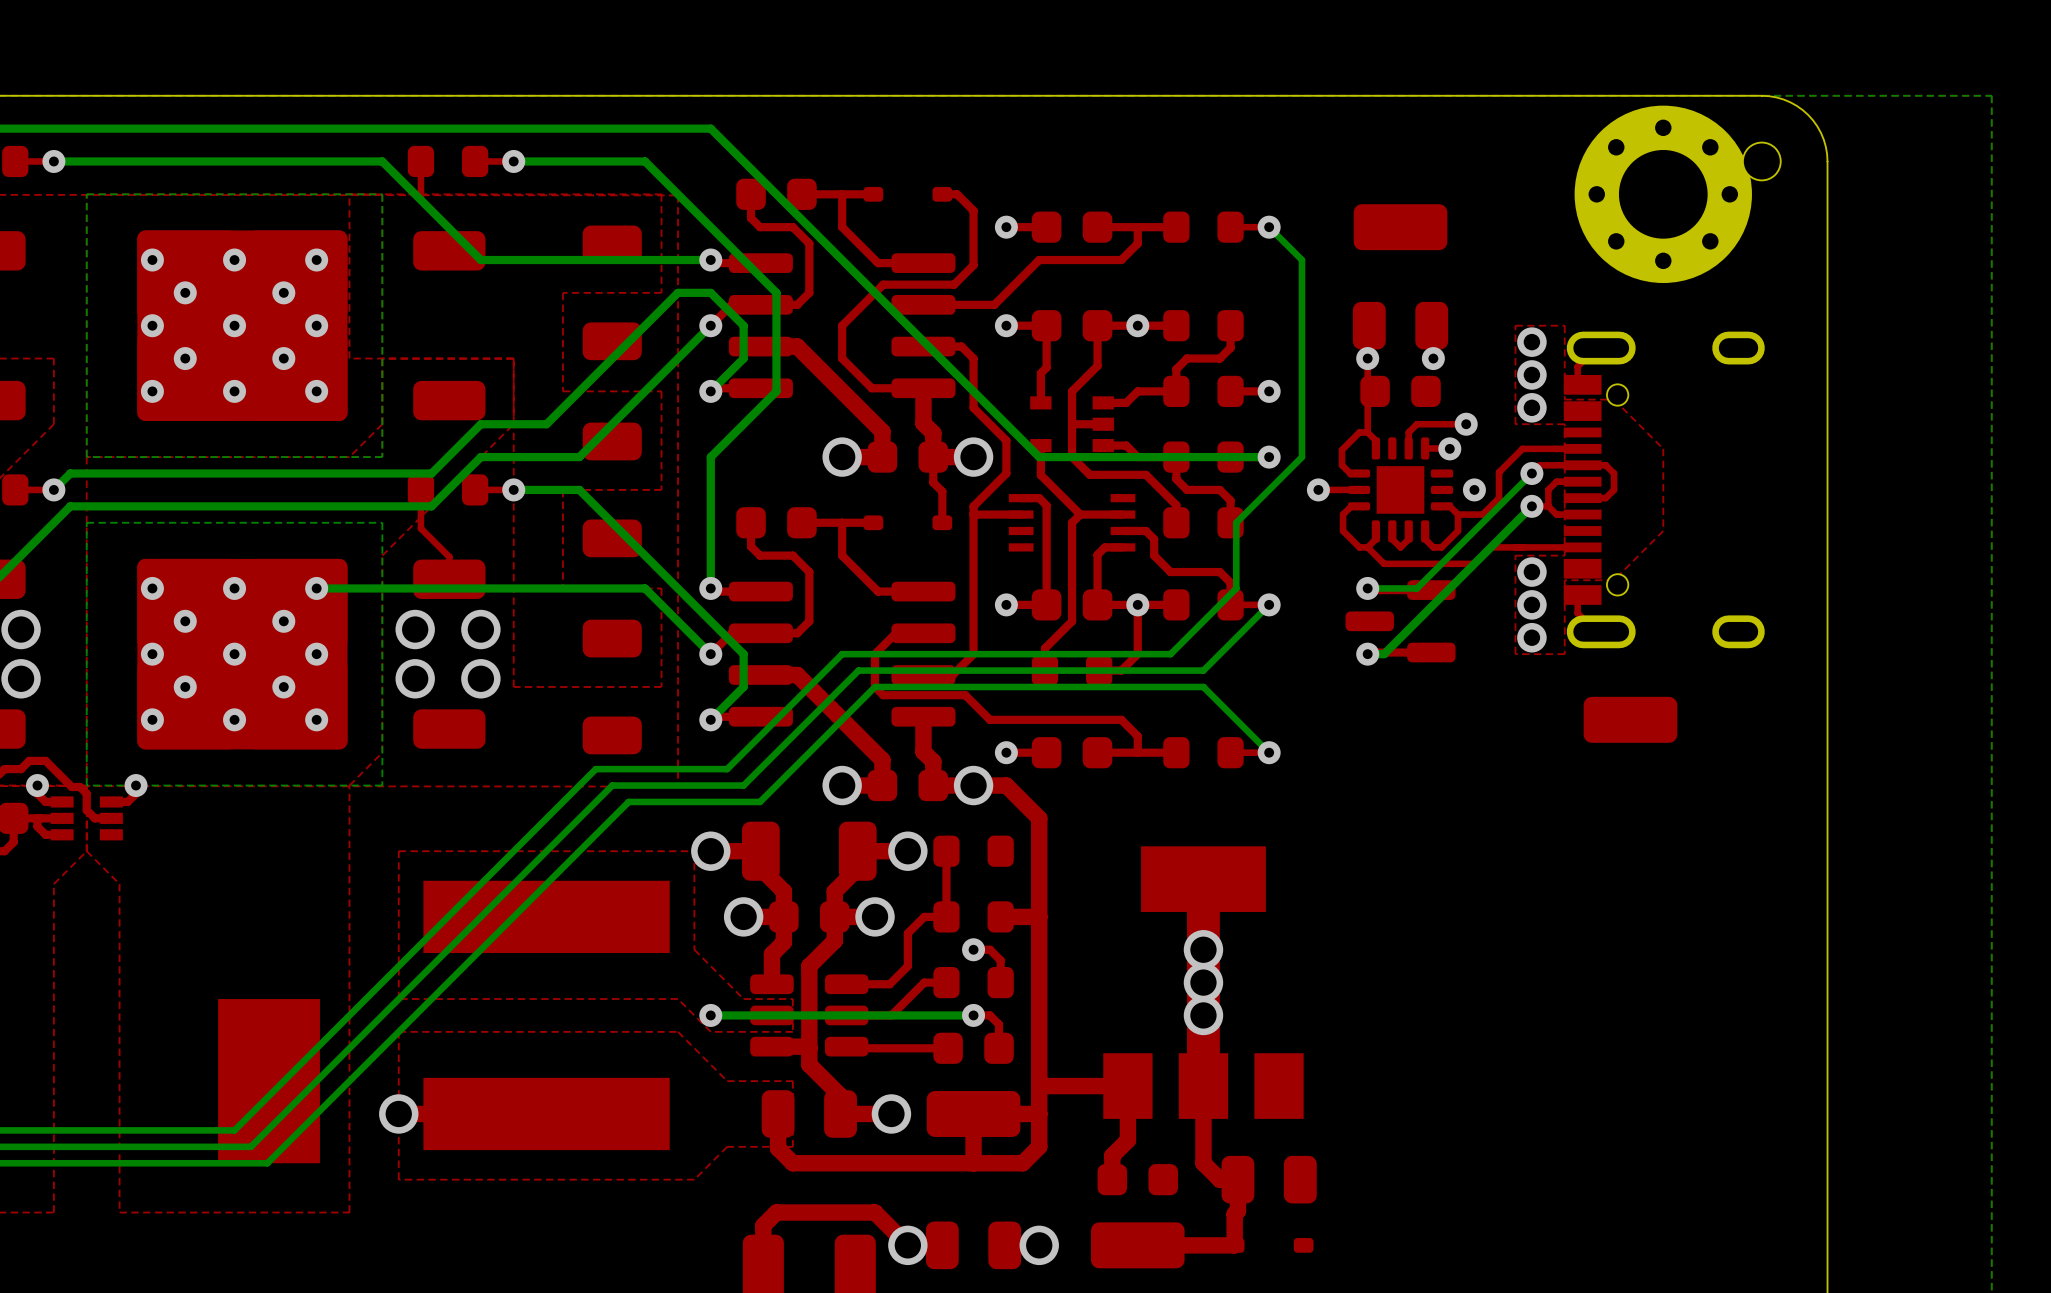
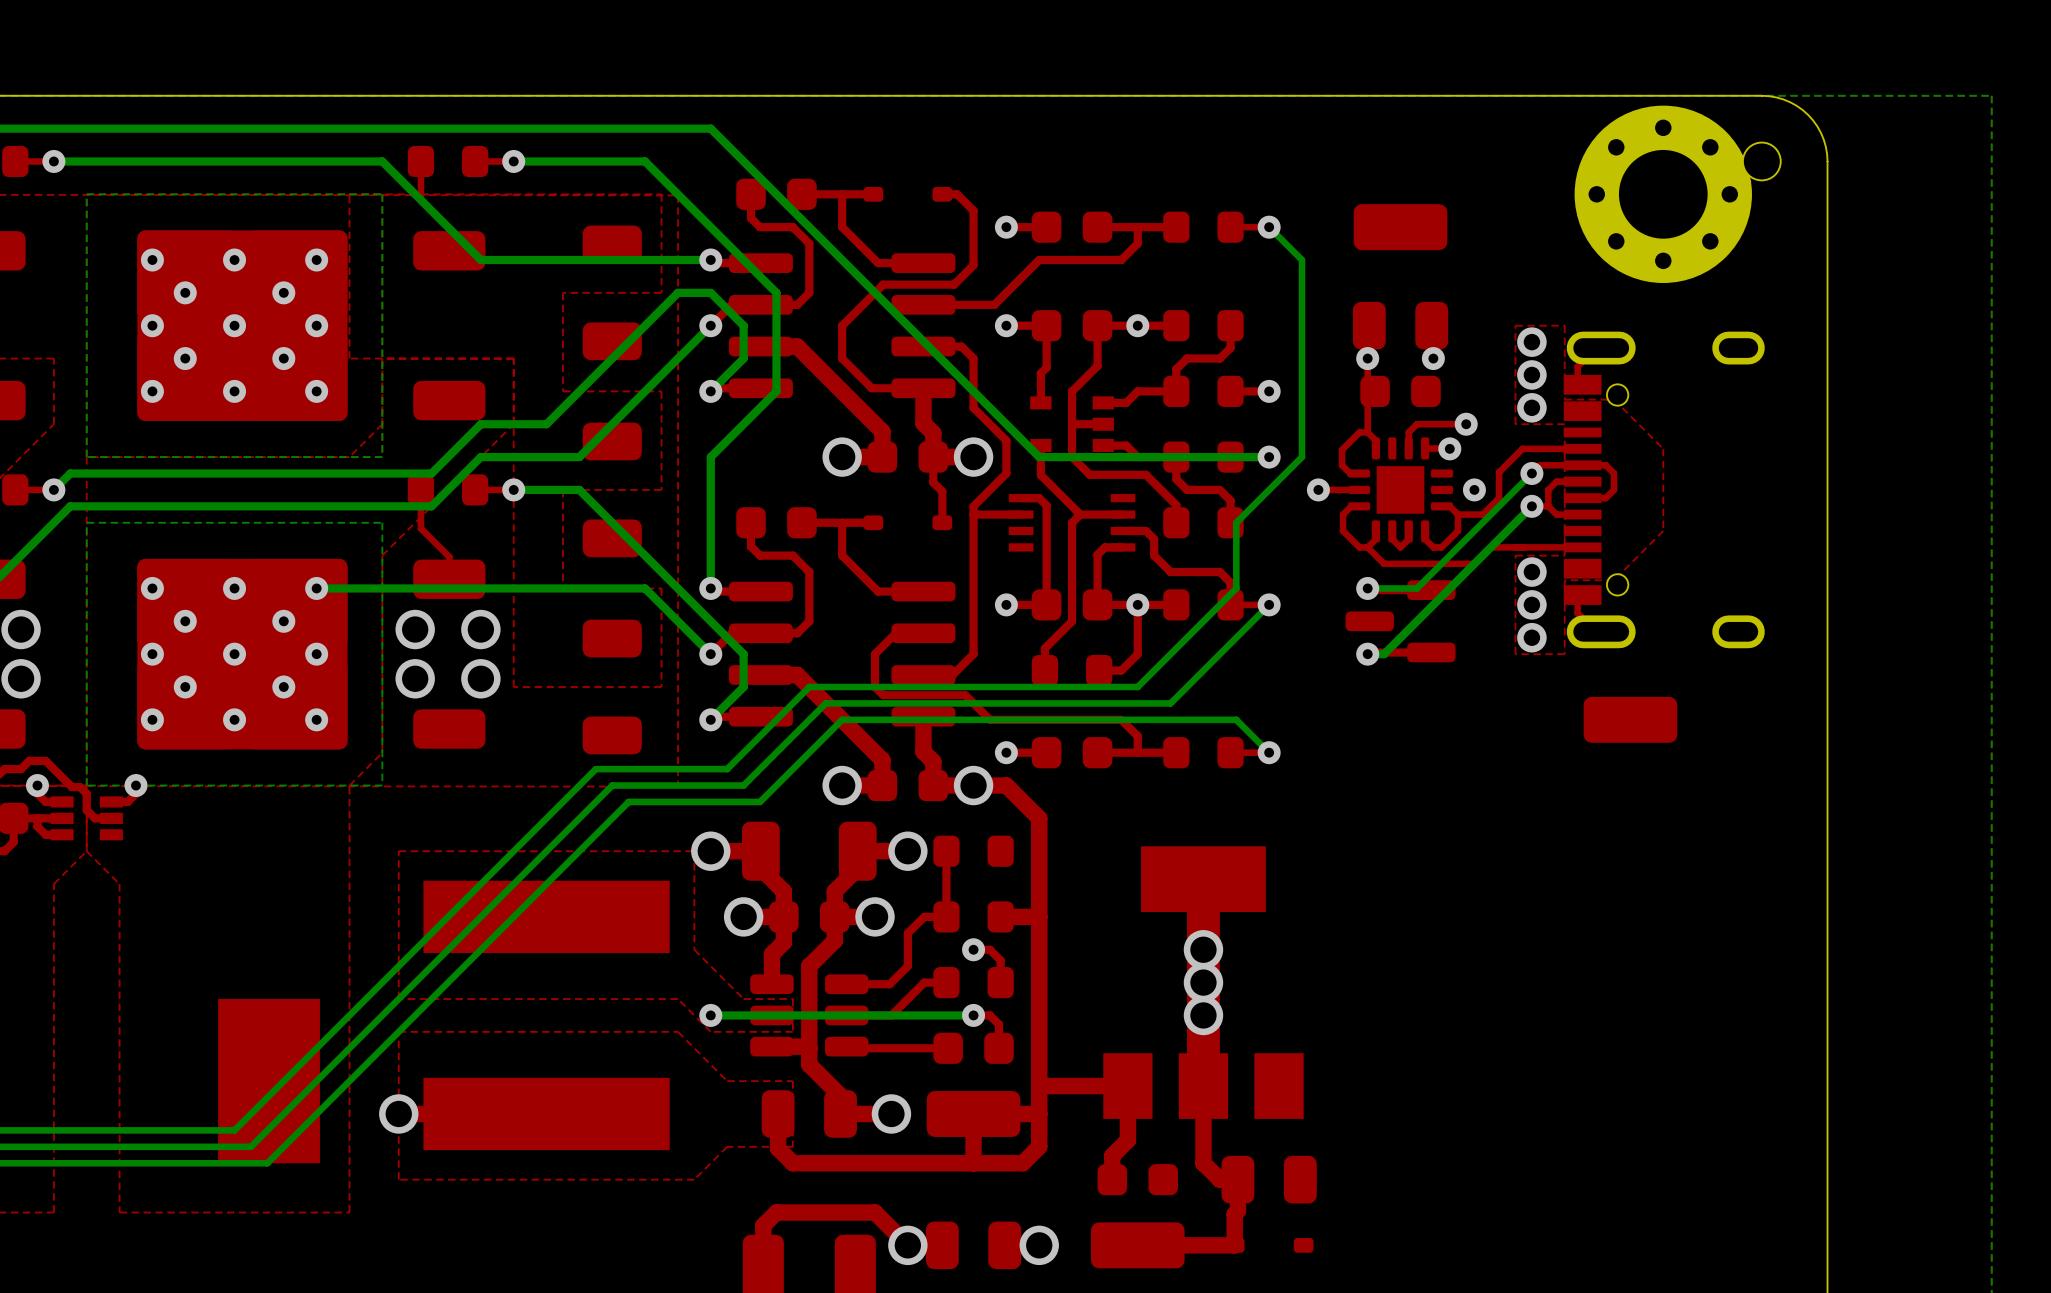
bottom track: (1170, 654) (842, 654) (809, 687) -> none
bottom track: (1203, 670) (858, 670) (825, 703) -> (1203, 670) (1170, 703) (825, 703)
bottom track: (875, 687) (842, 719) -> (875, 687) (809, 687)
bottom track: (1137, 687) (1203, 687) (1236, 719) -> (1137, 687) (1170, 654)
bottom track: none -> (1236, 719) (842, 719)

